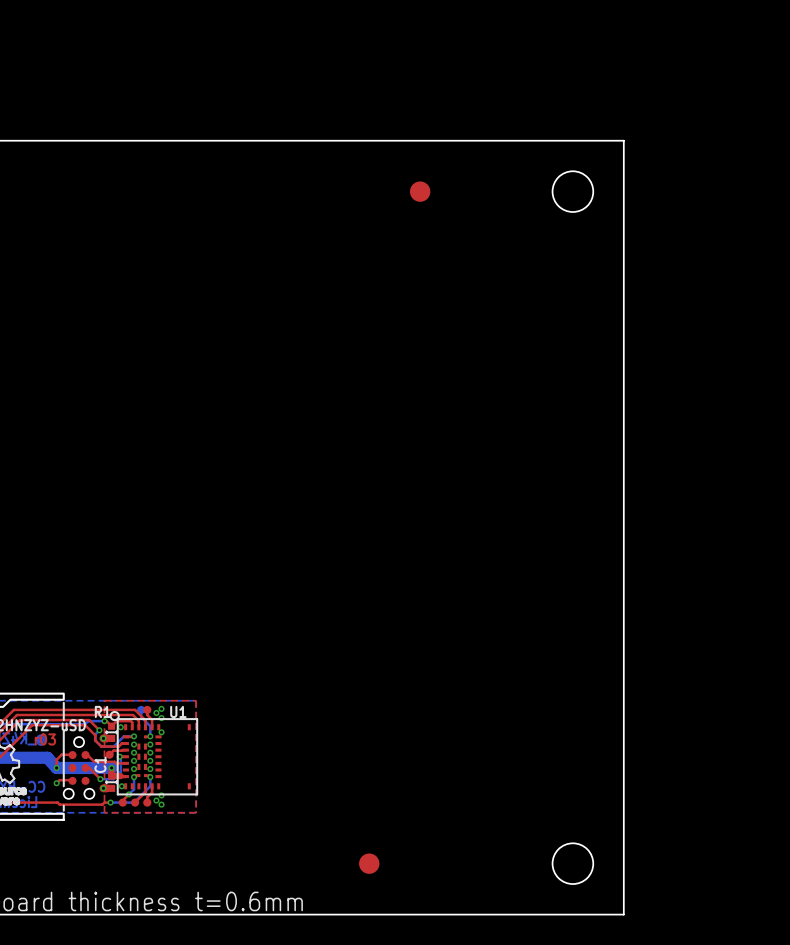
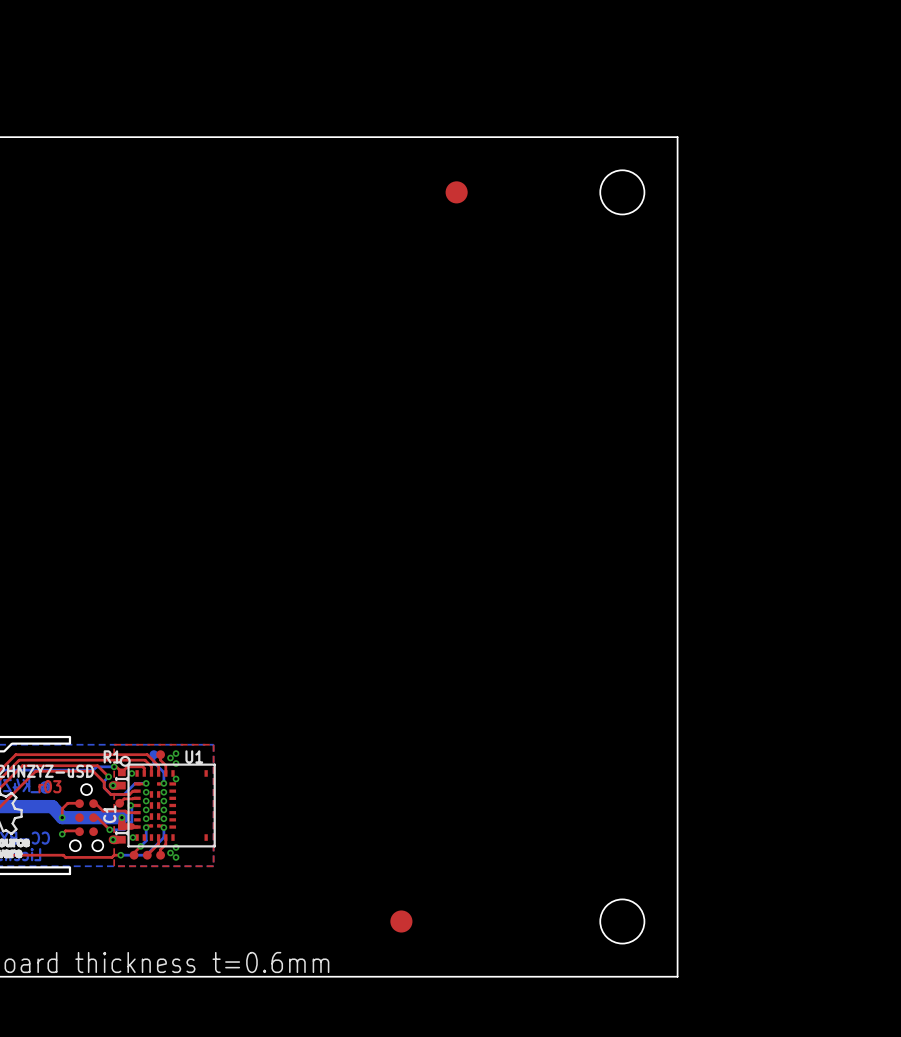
line: (63, 702) (63, 720) -> none
line: (63, 731) (63, 786) -> none
line: (63, 805) (63, 810) -> none

